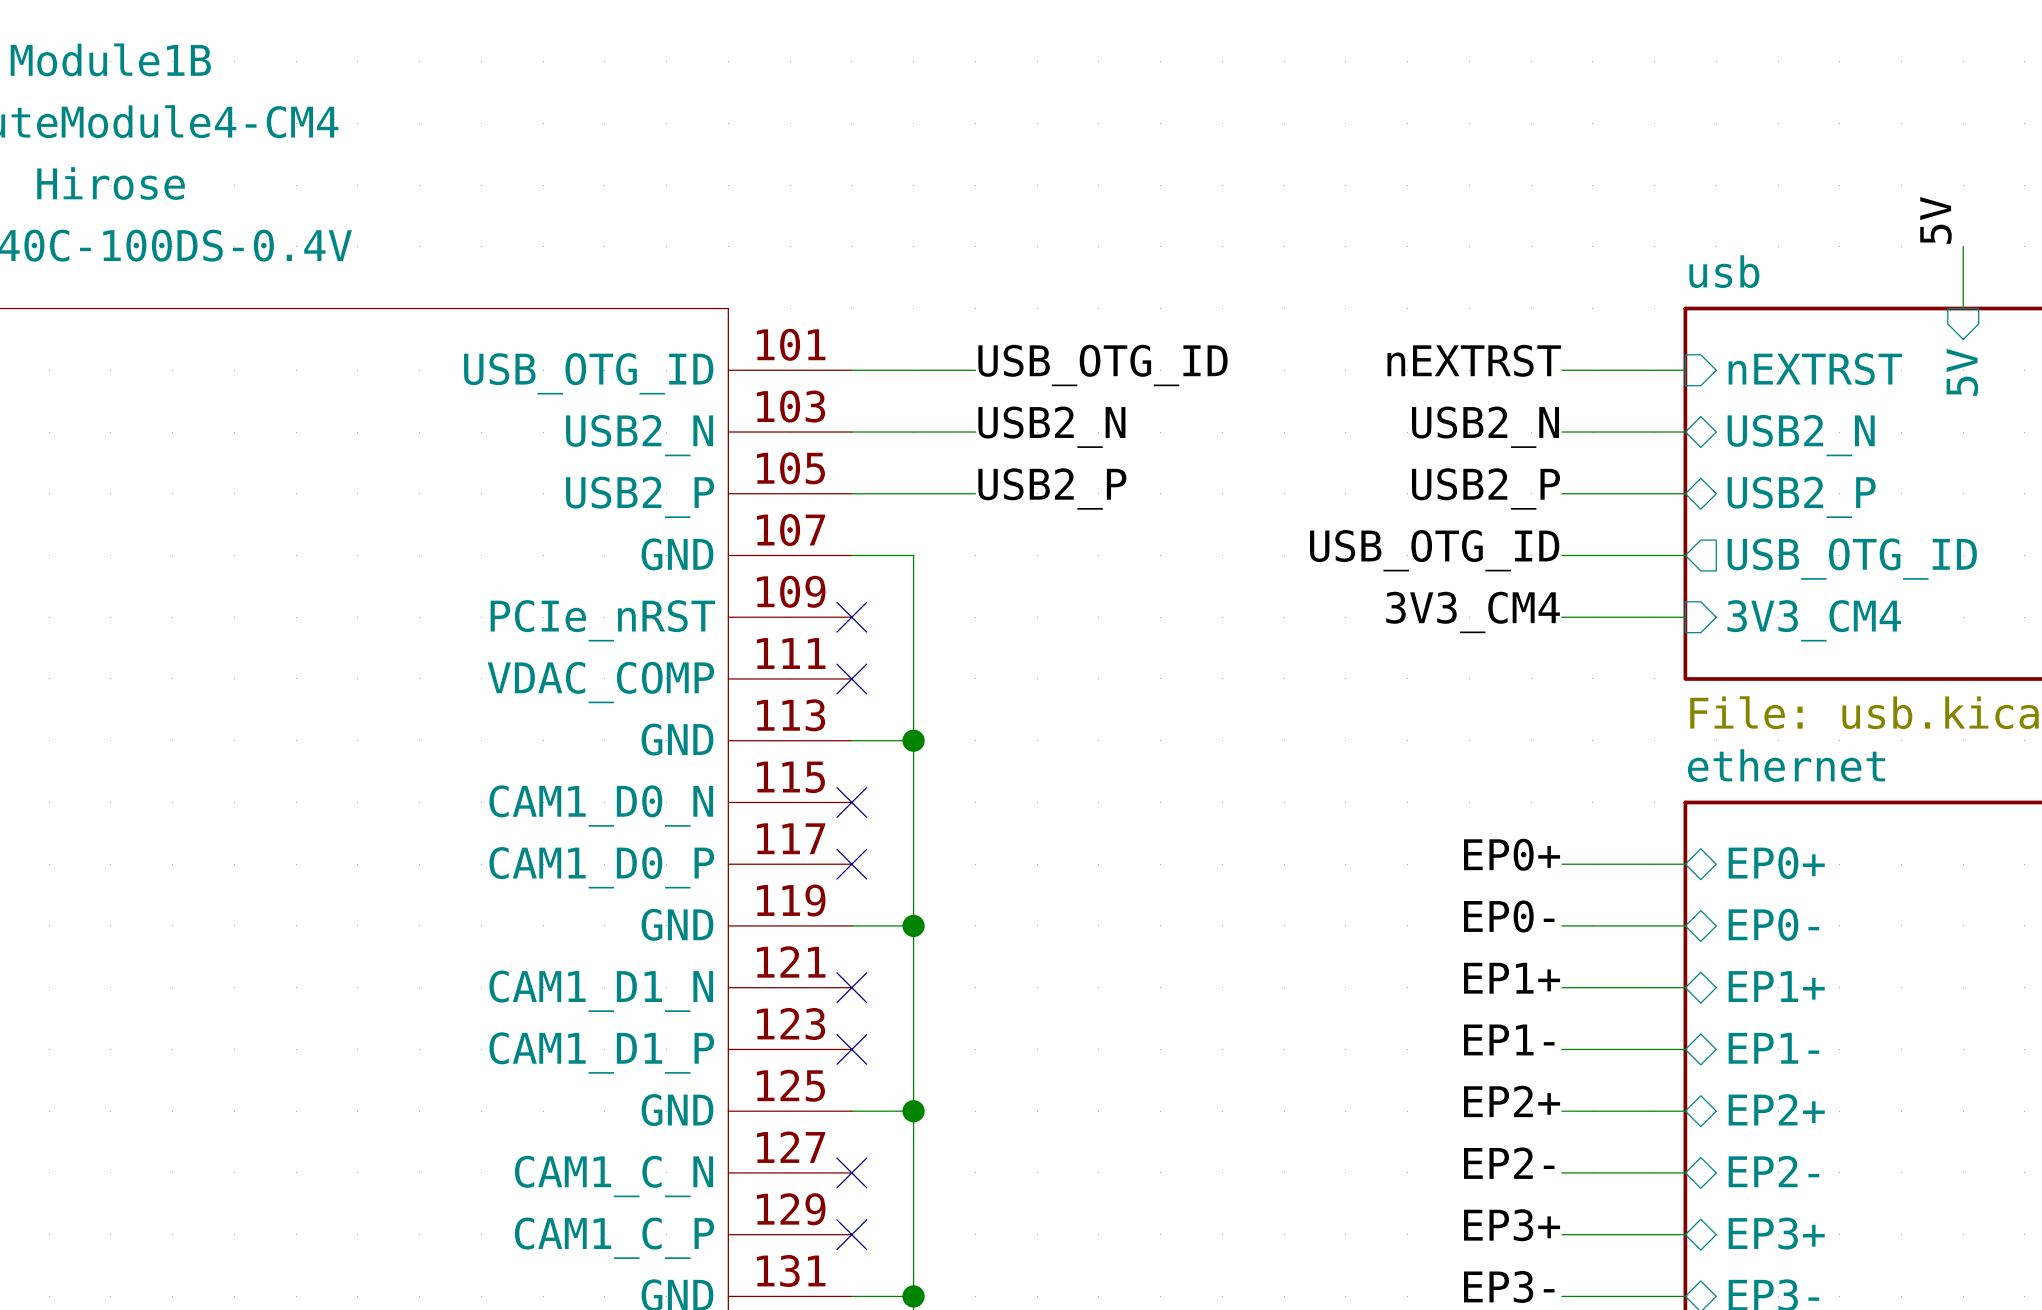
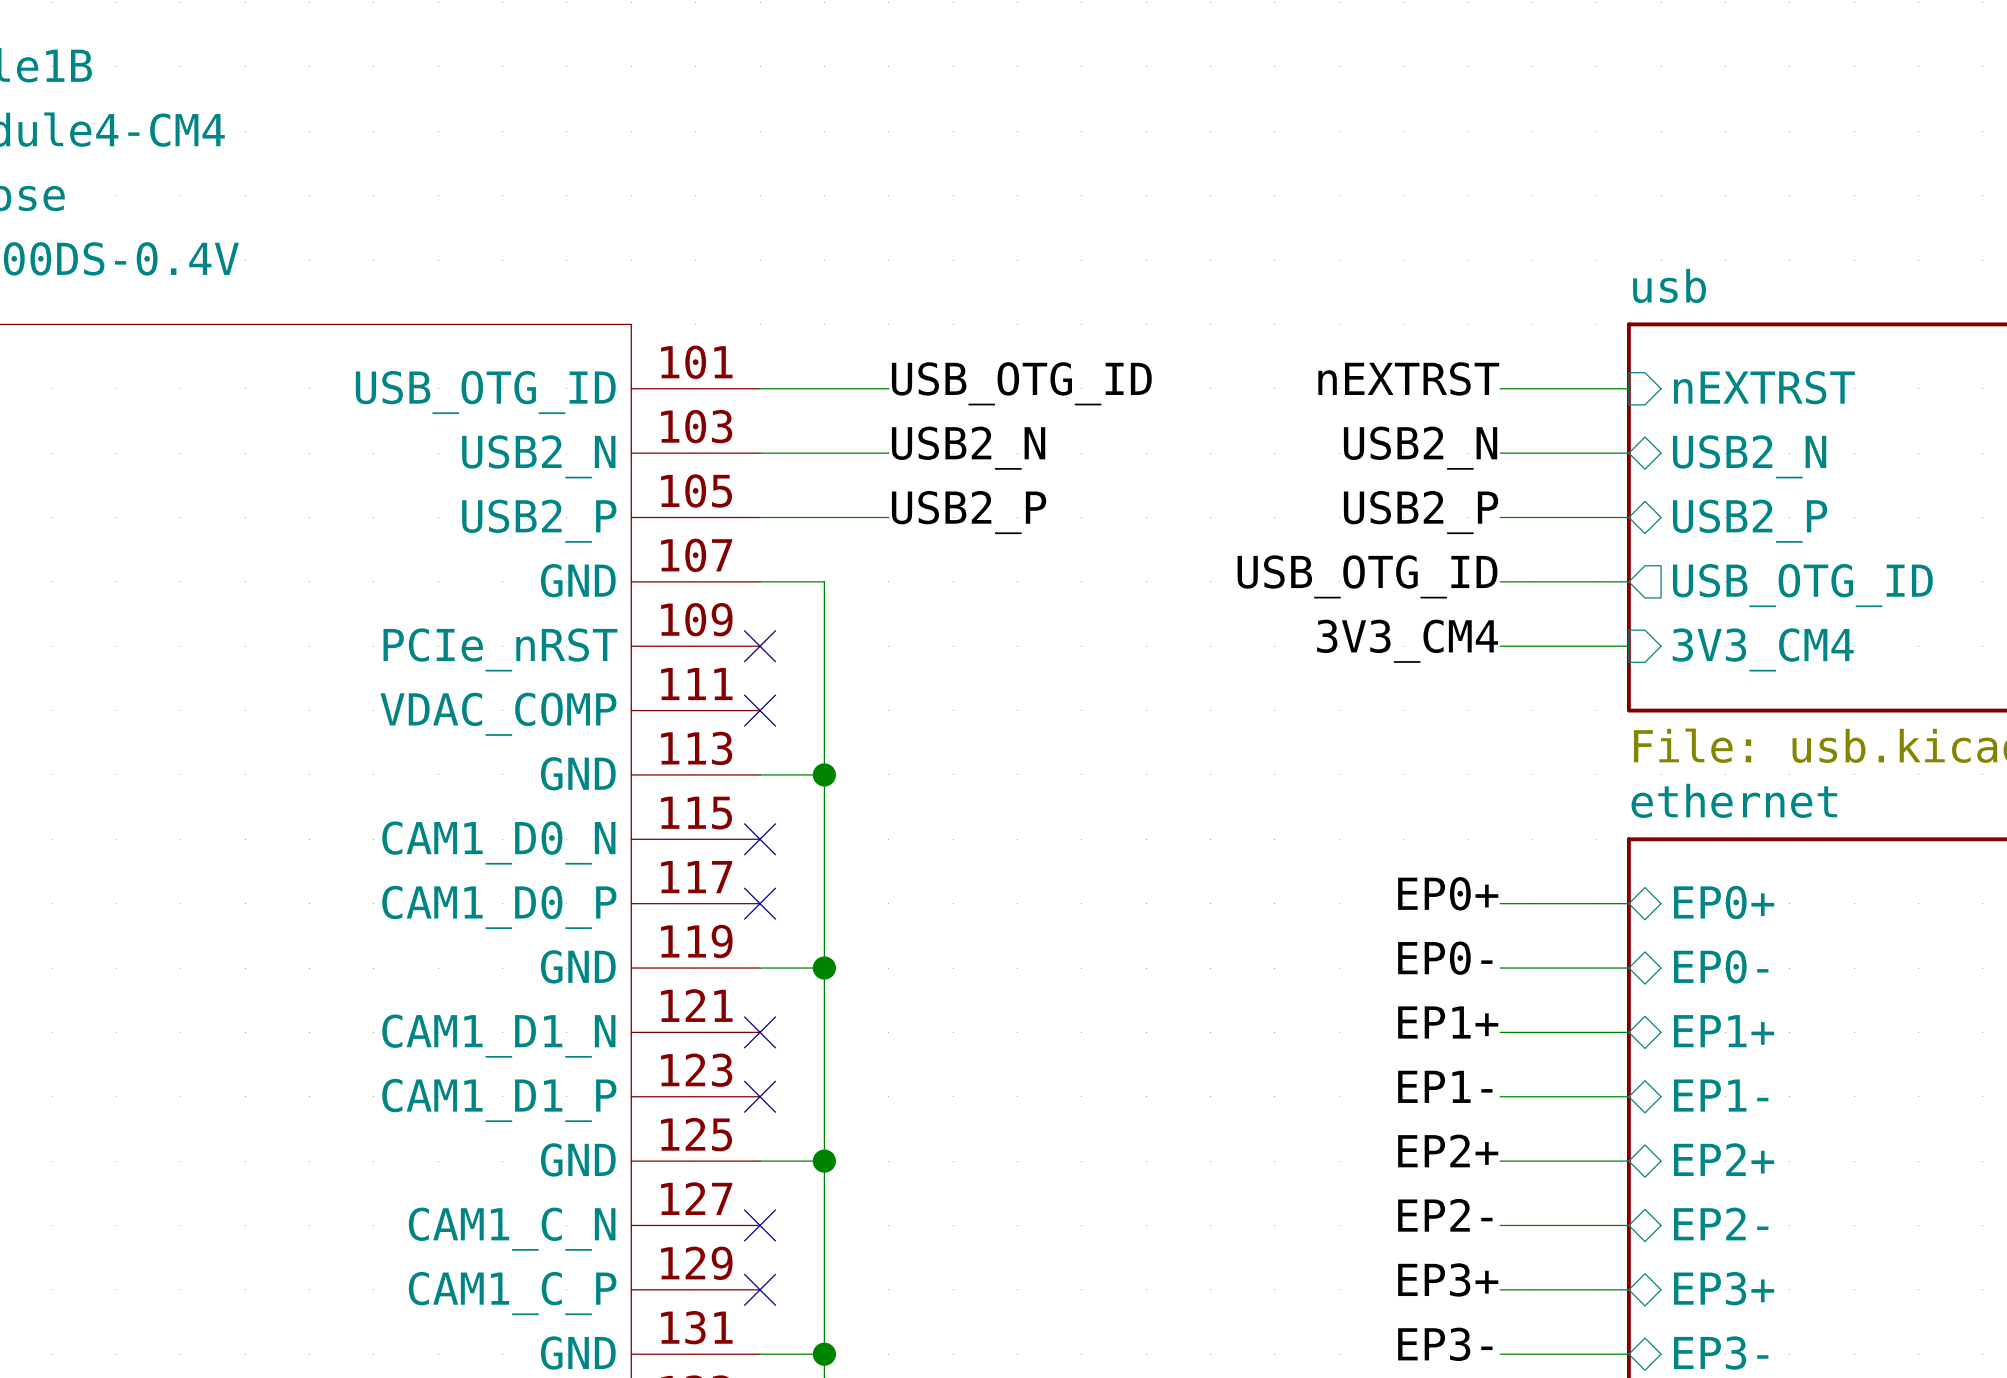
label: 5V (1935, 220) -> none
wire: (1963, 246) (1963, 308) -> none
sheet pin: 5V (1962, 372) -> none

